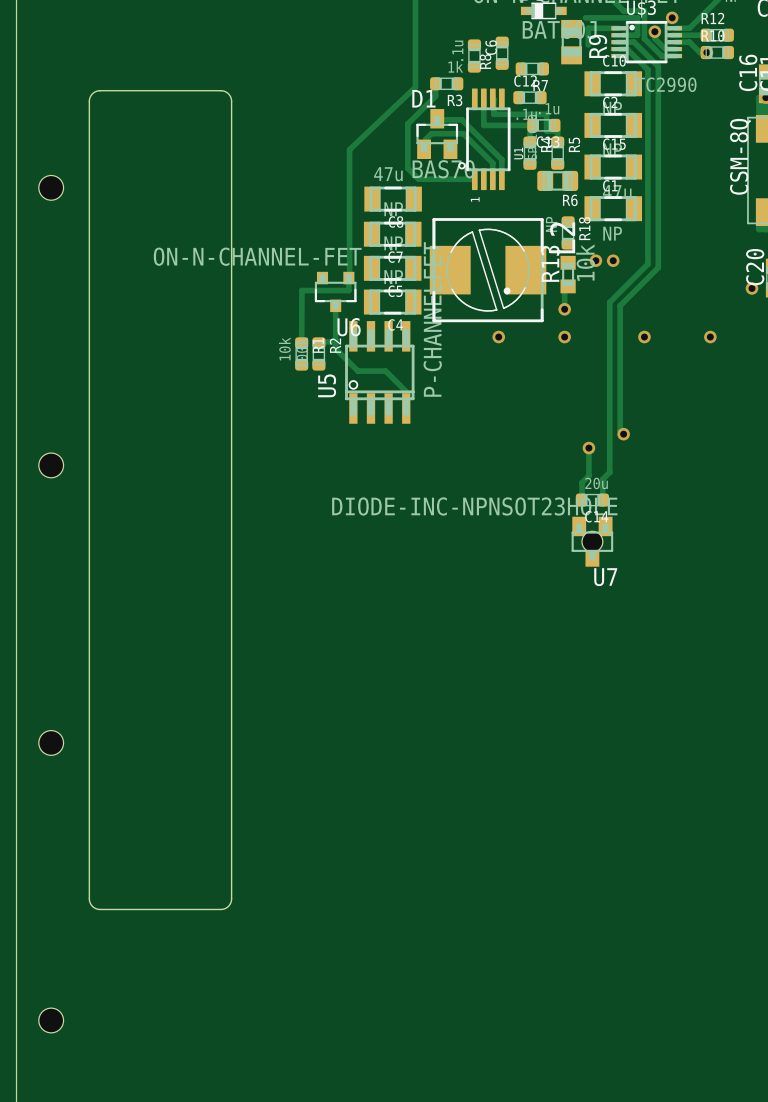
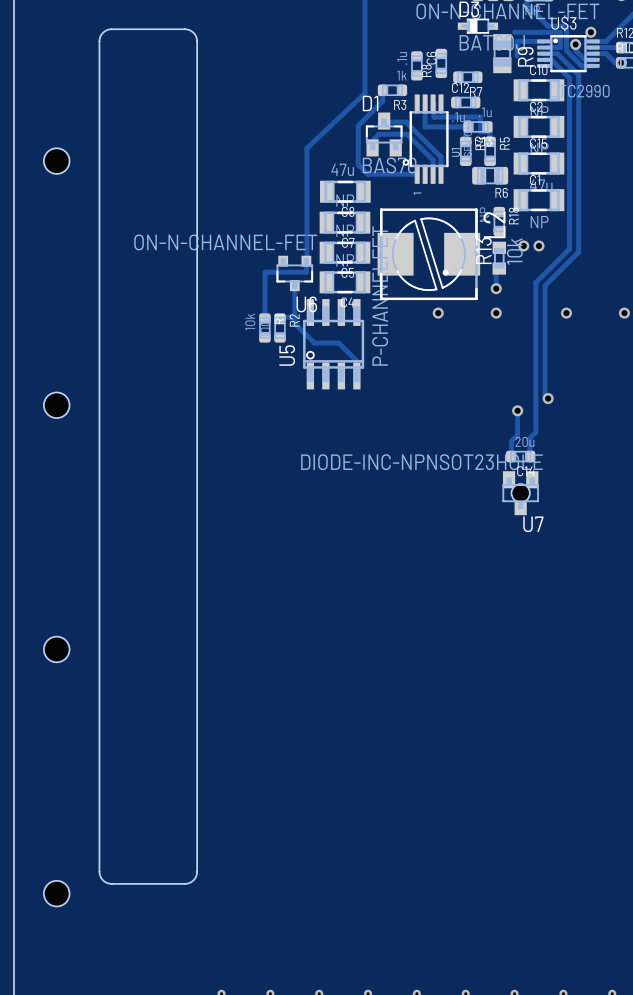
board edge: (100, 90) (222, 90) (228, 93) (231, 99) (231, 898) (228, 906) (222, 909) (98, 909) (92, 906) (89, 900) (89, 101) (92, 93) (100, 90) -> (111, 29) (103, 32) (99, 41) (99, 873) (103, 880) (110, 883) (186, 883) (194, 879) (197, 871) (197, 39) (193, 32) (186, 29) (111, 29)
hole: none -> (56, 161)
hole: (51, 187) -> none
hole: none -> (56, 405)
hole: (51, 465) -> none
hole: none -> (56, 649)
hole: (51, 742) -> none
hole: none -> (56, 893)
hole: (51, 1020) -> none

